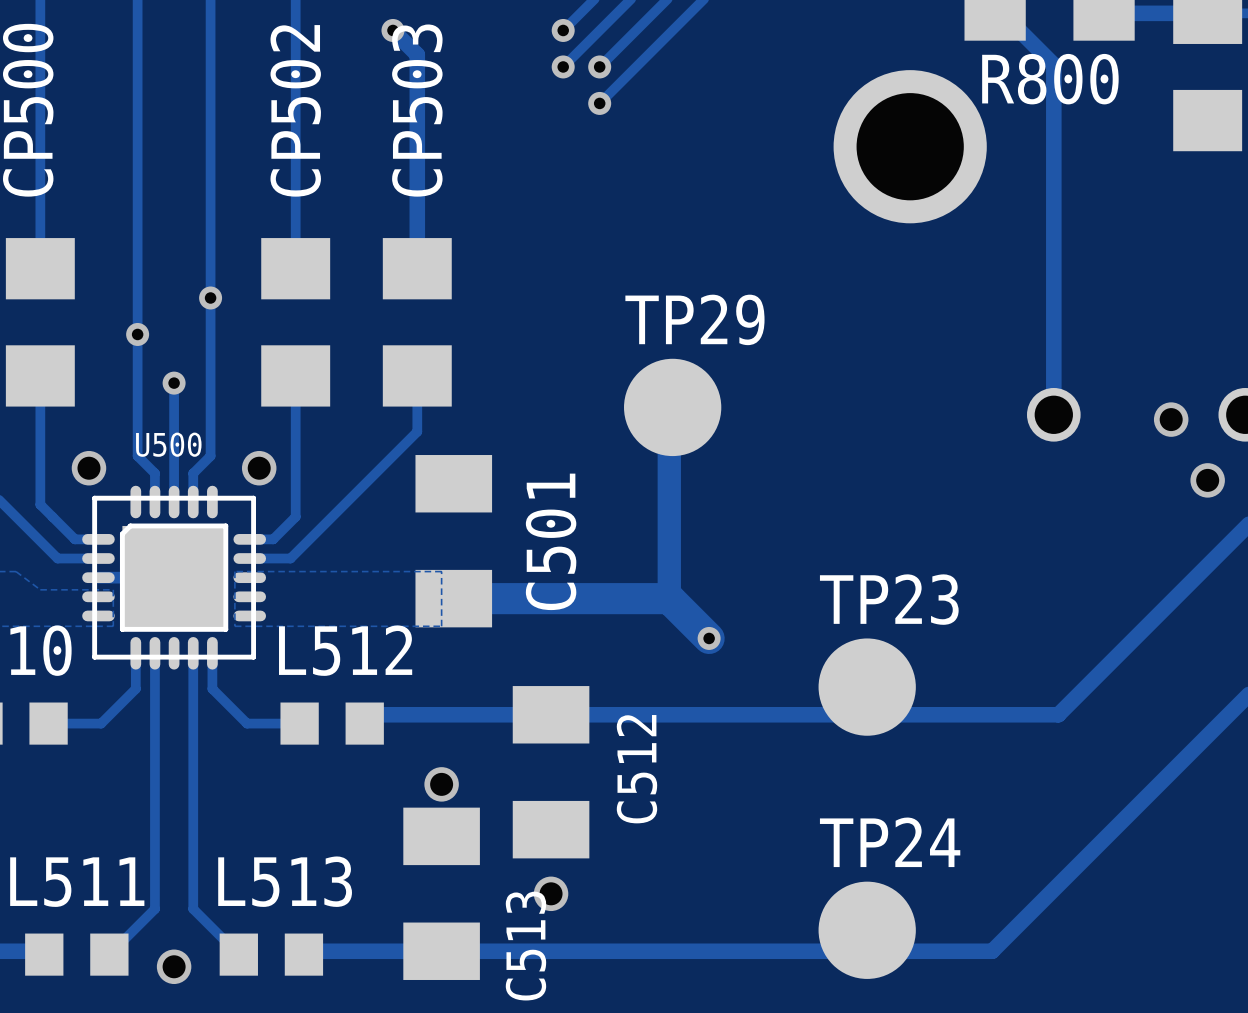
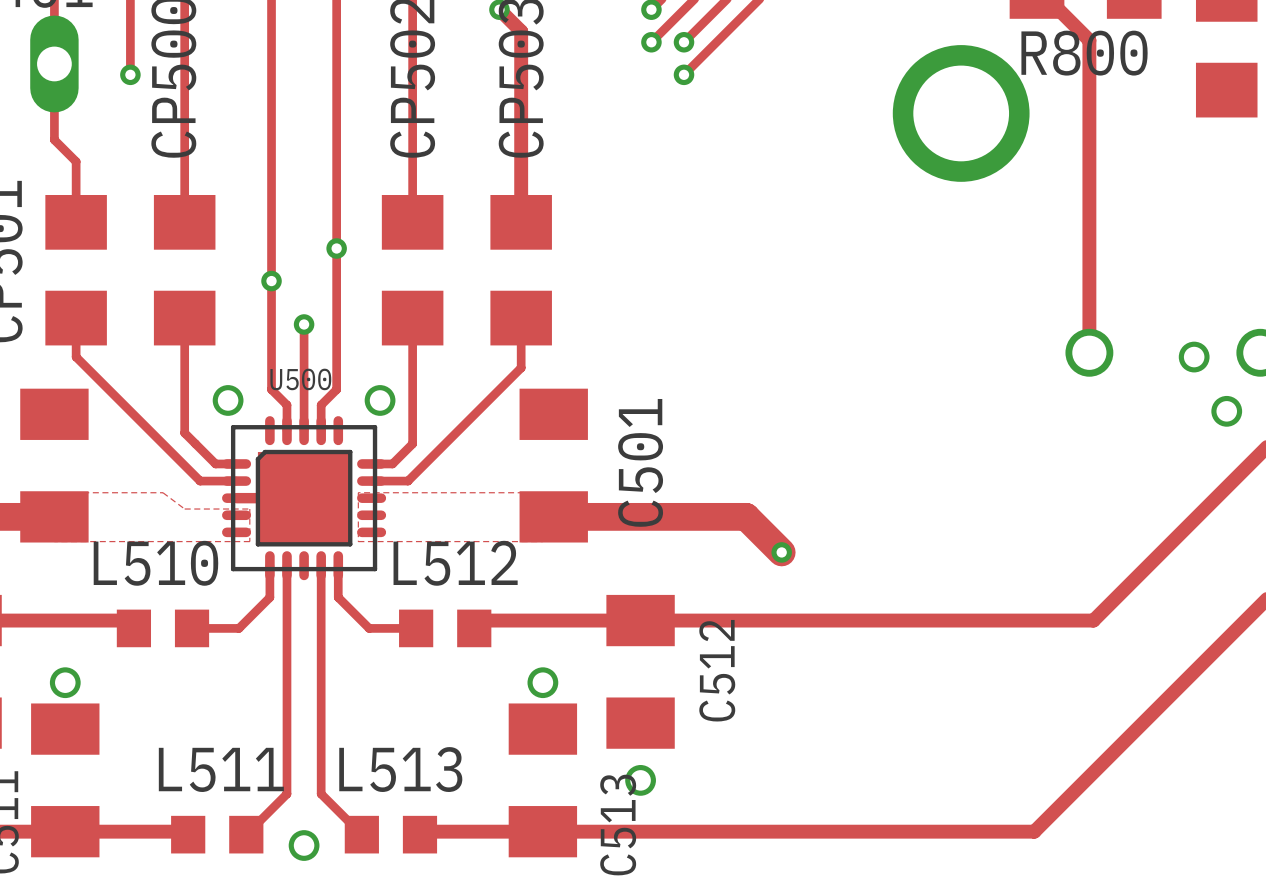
track: (672, 407) (669, 407) (669, 598) -> none
TP29: (672, 407) -> none
TP23: (867, 687) -> none
TP24: (867, 930) -> none

